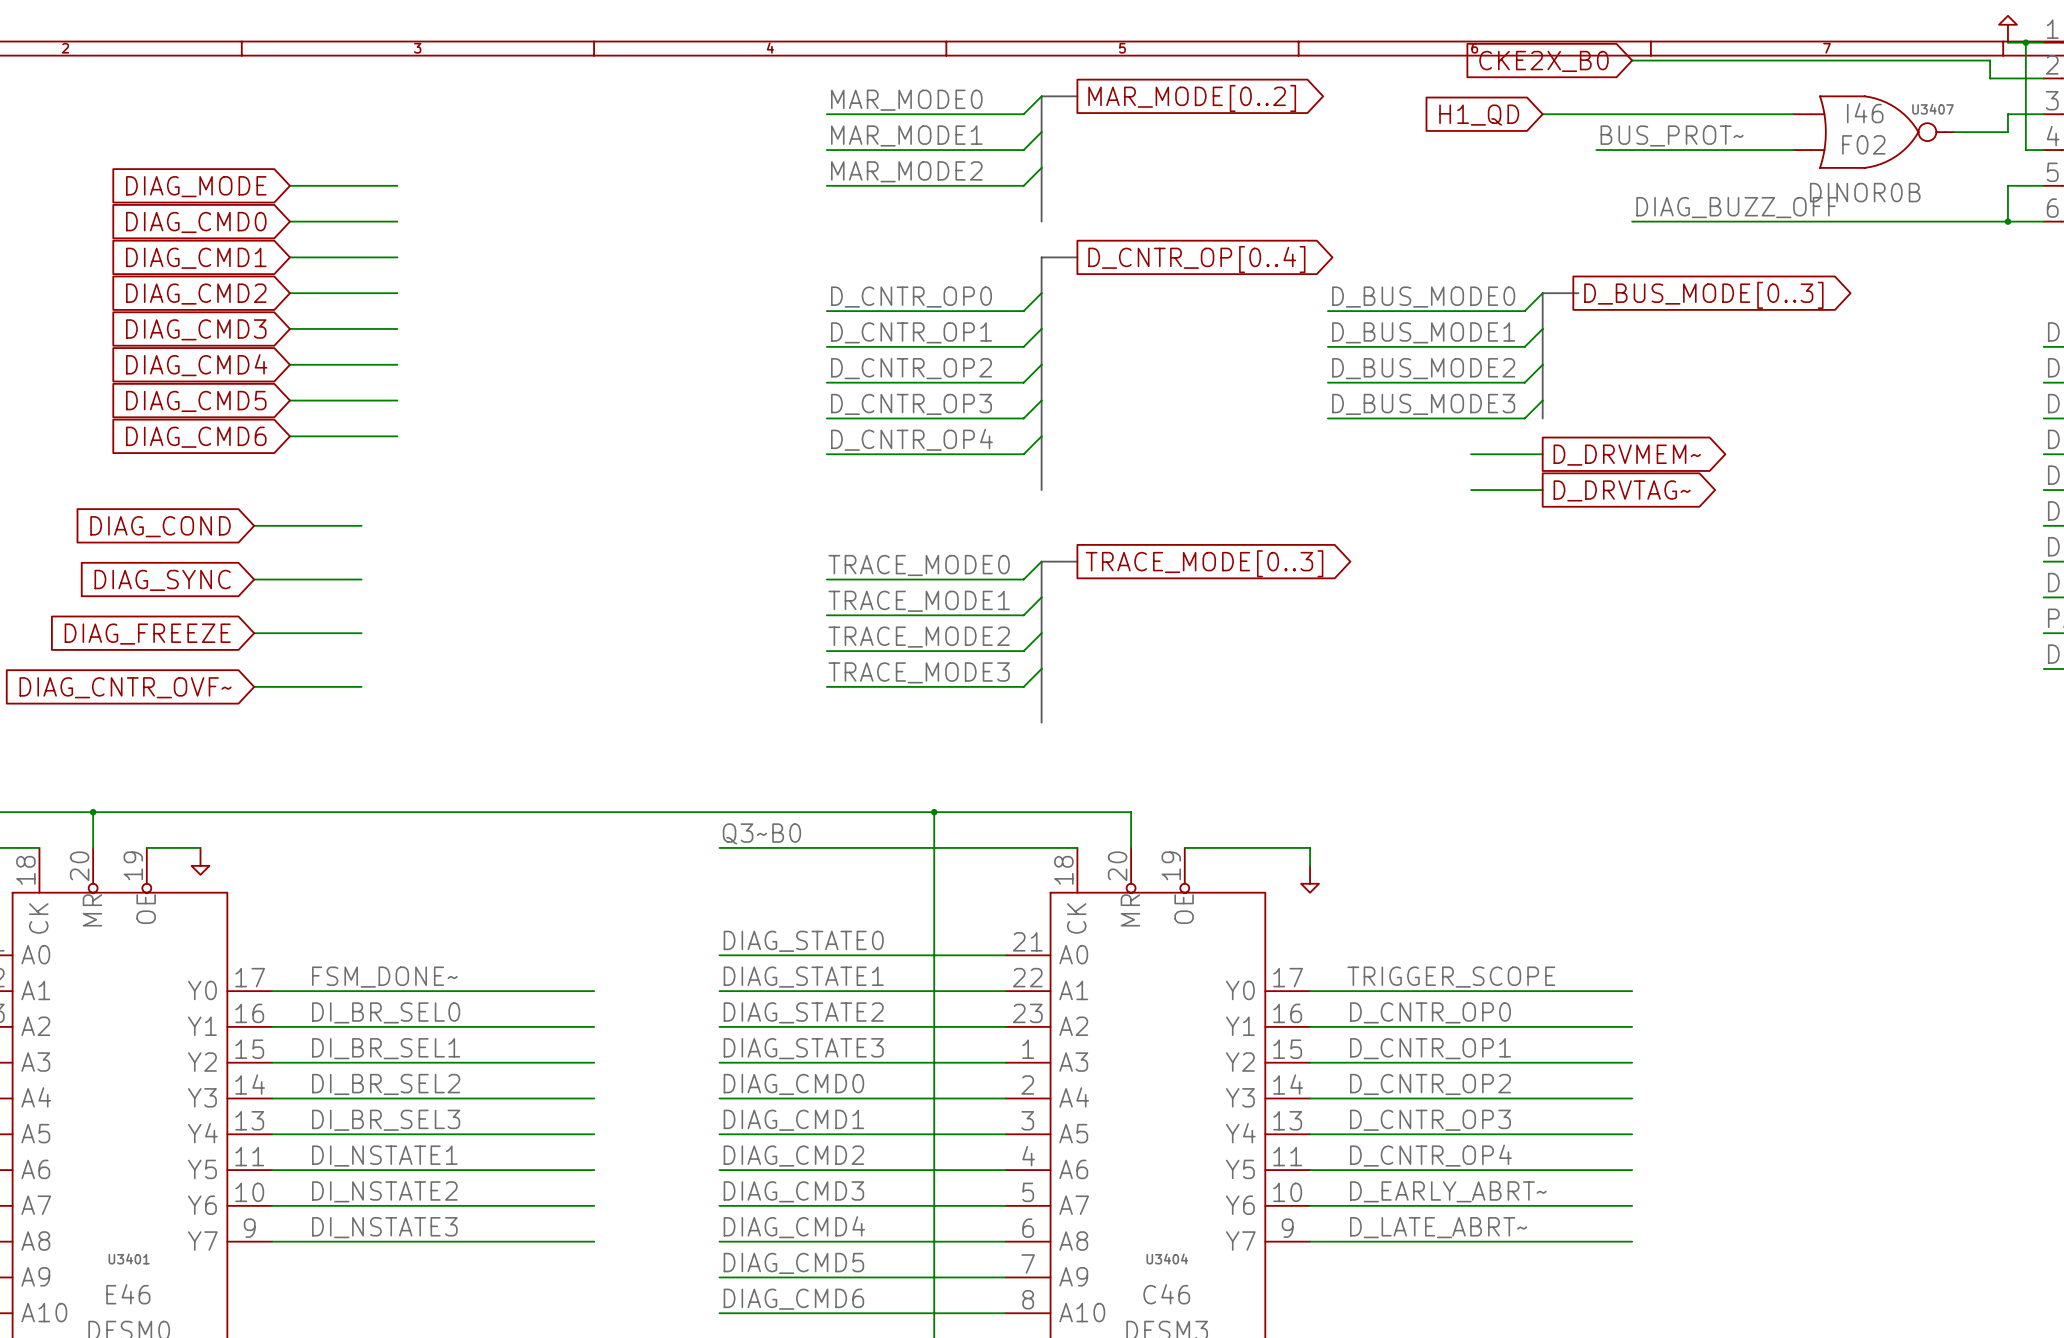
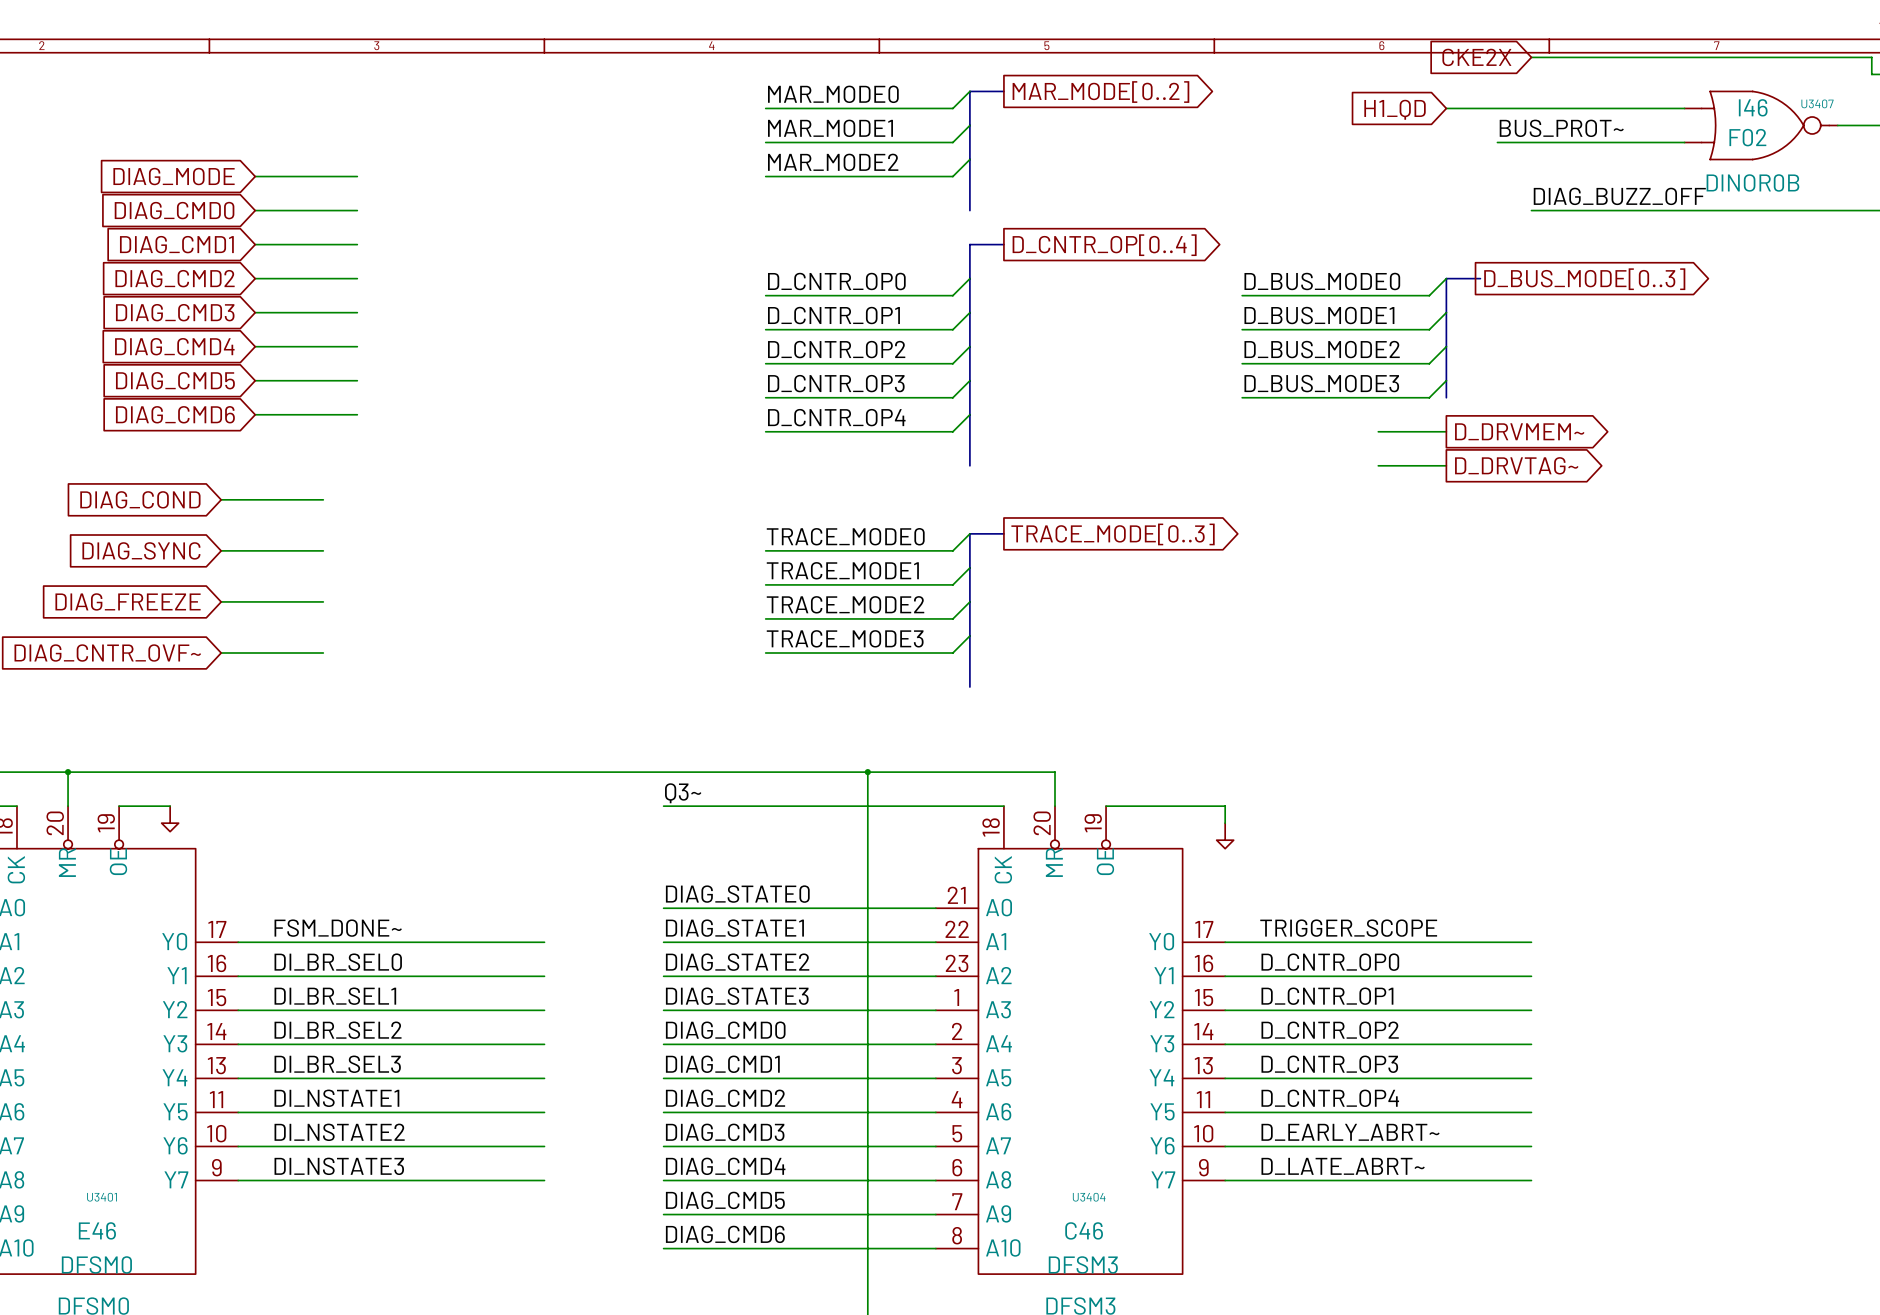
global label: CKE2X_B0 (1544, 61) -> CKE2X (1476, 57)
label: Q3~B0 (761, 833) -> Q3~ (683, 793)

